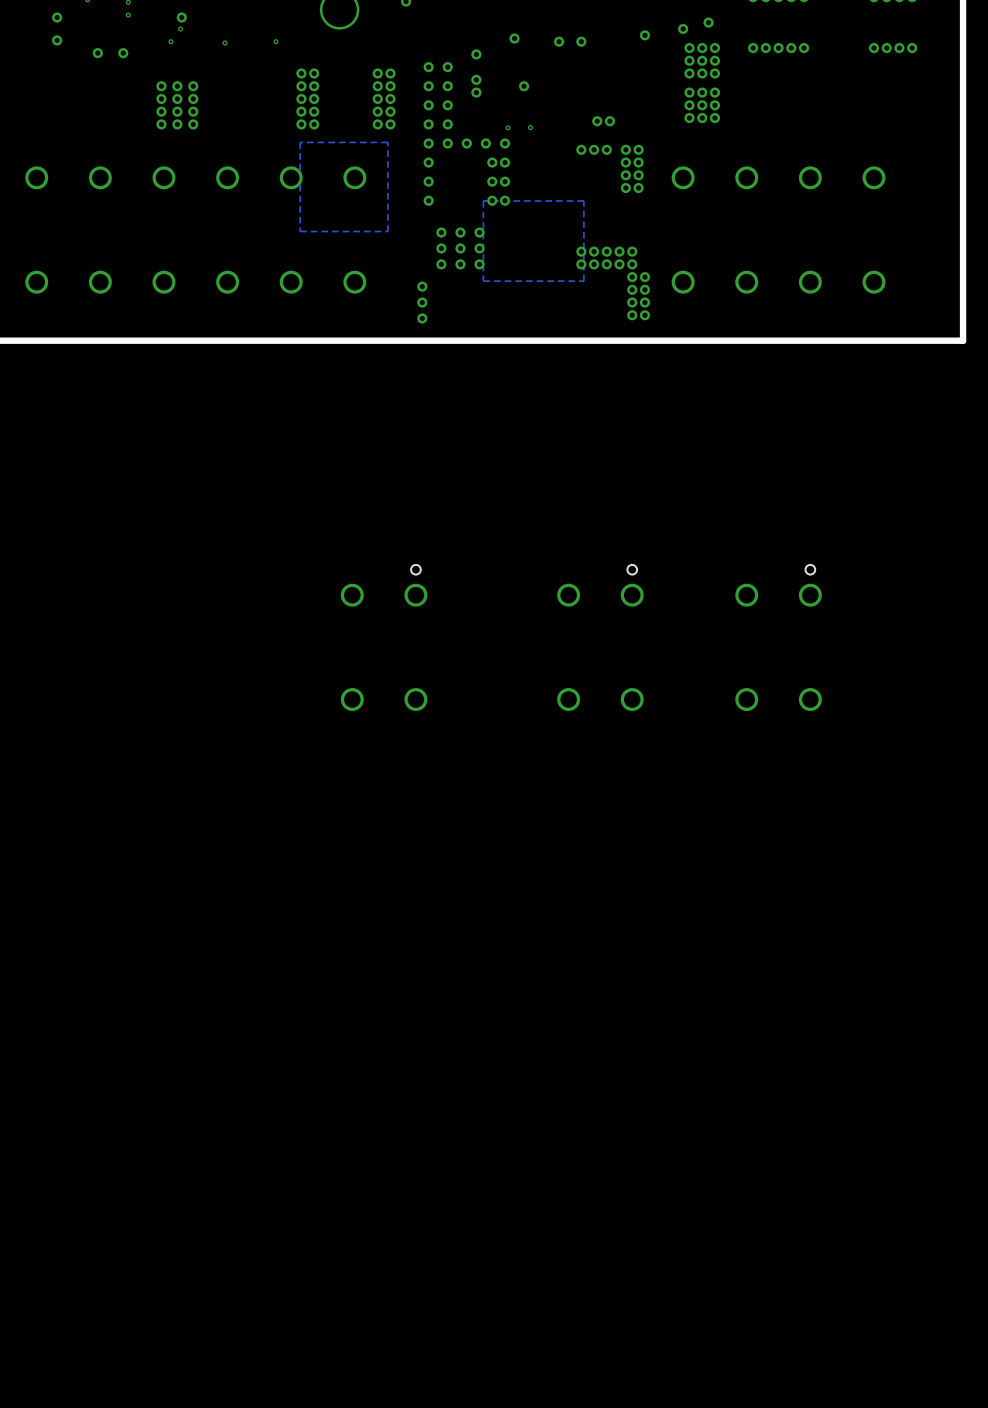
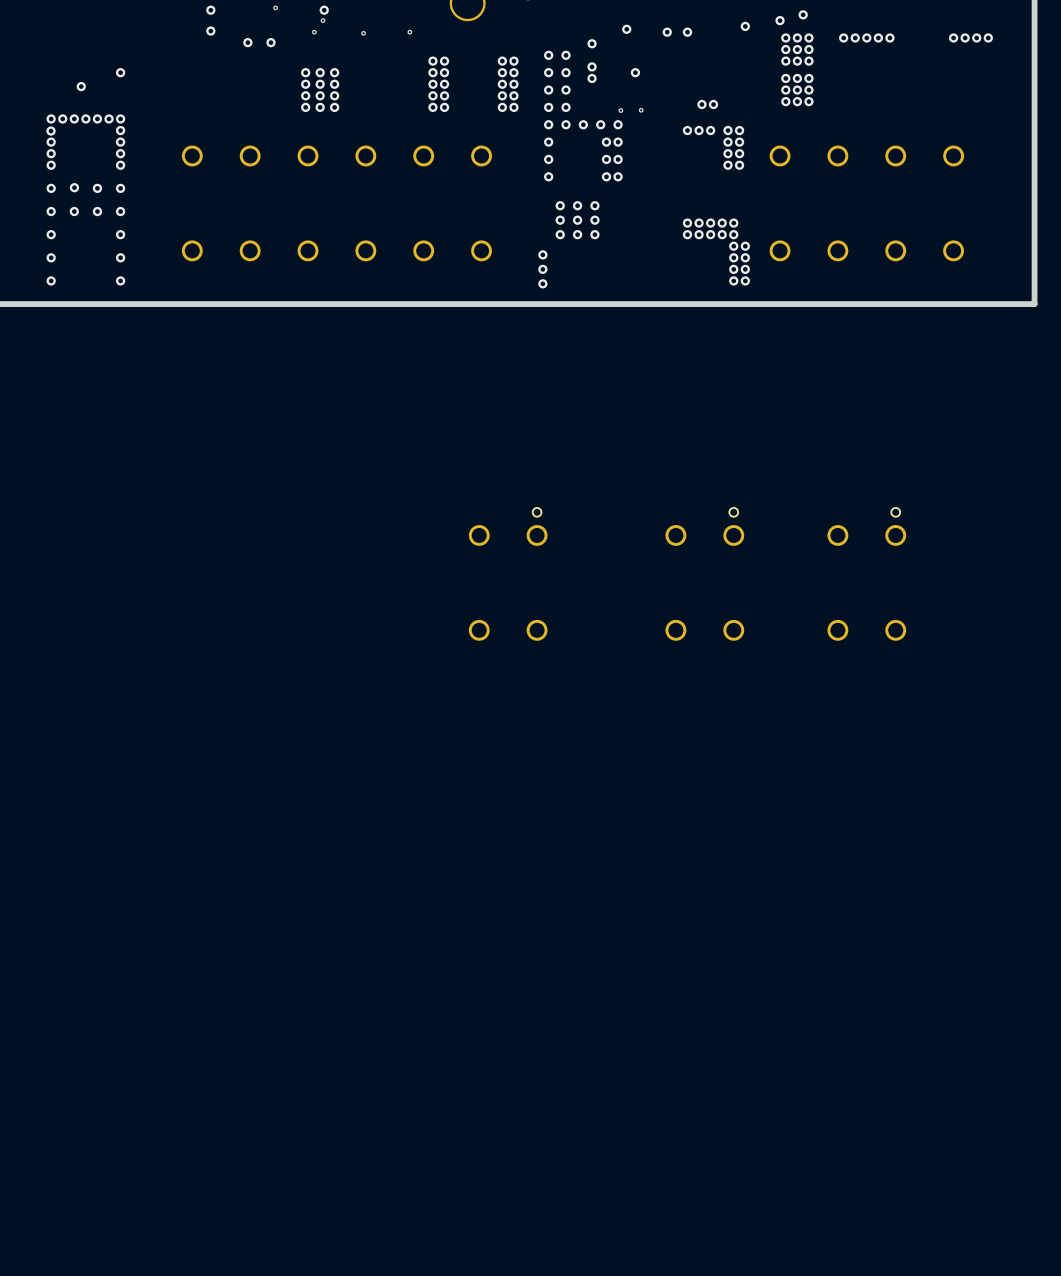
zone outline: (387, 142) (387, 231) (300, 231) (300, 142) (387, 142) -> none
zone outline: (583, 200) (583, 281) (483, 281) (483, 200) (583, 200) -> none

